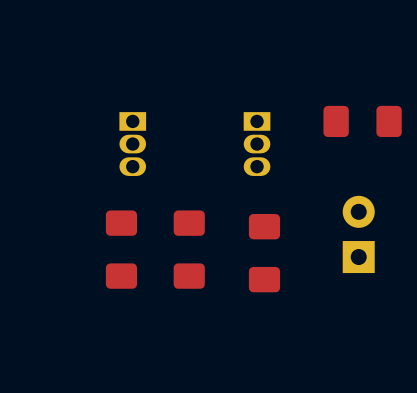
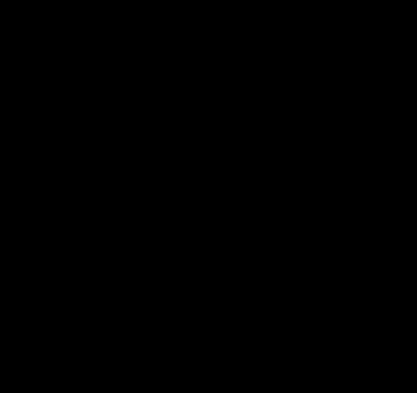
part: (362, 121) -> none
part: (132, 144) -> none
part: (257, 144) -> none
part: (358, 234) -> none
part: (121, 249) -> none
part: (189, 249) -> none
part: (264, 253) -> none

